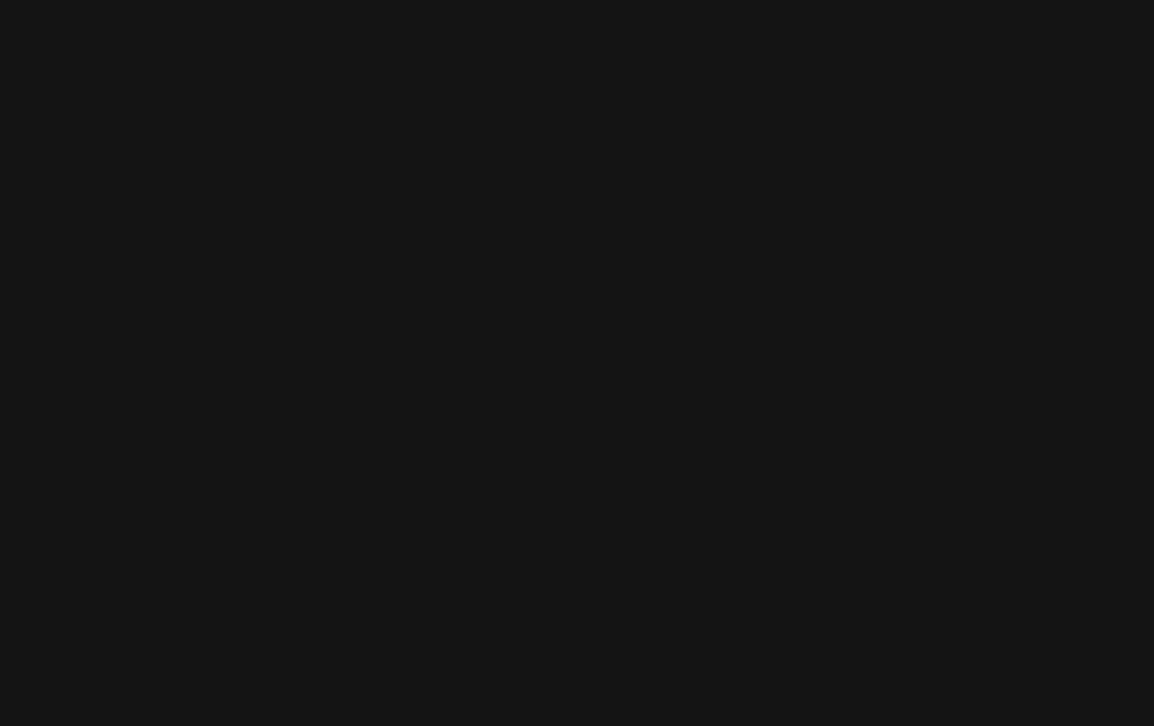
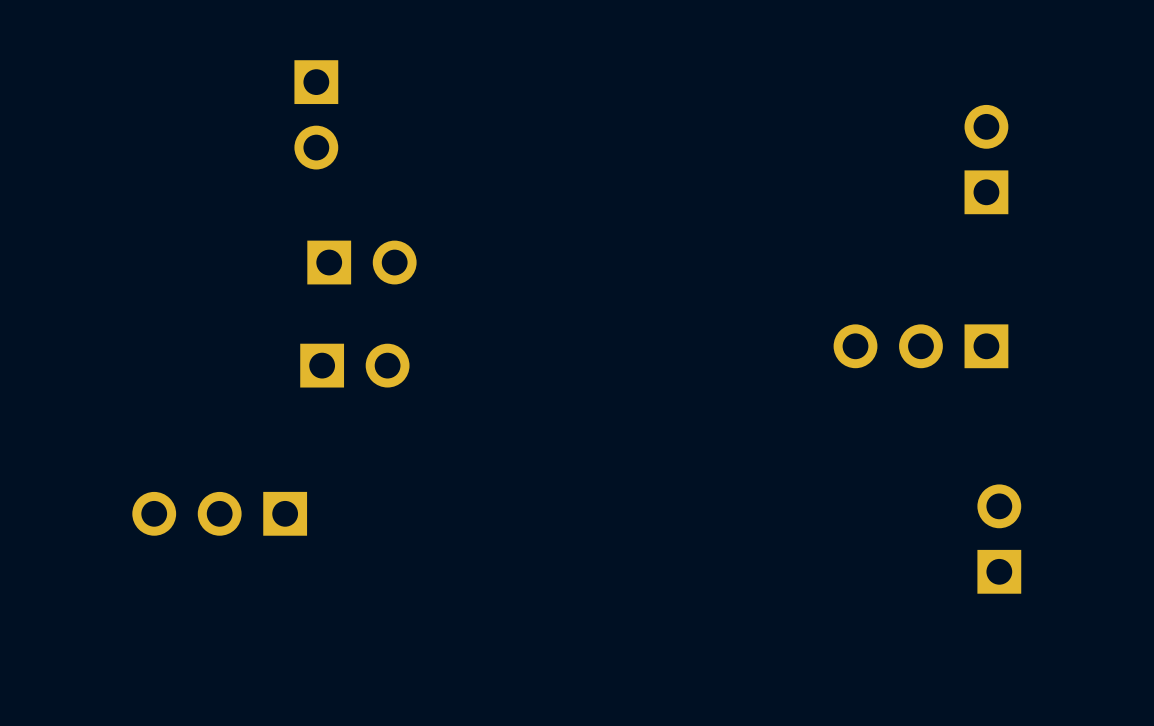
part: none -> (316, 114)
part: none -> (986, 159)
part: none -> (361, 262)
part: none -> (920, 346)
part: none -> (354, 365)
part: none -> (219, 513)
part: none -> (999, 539)

